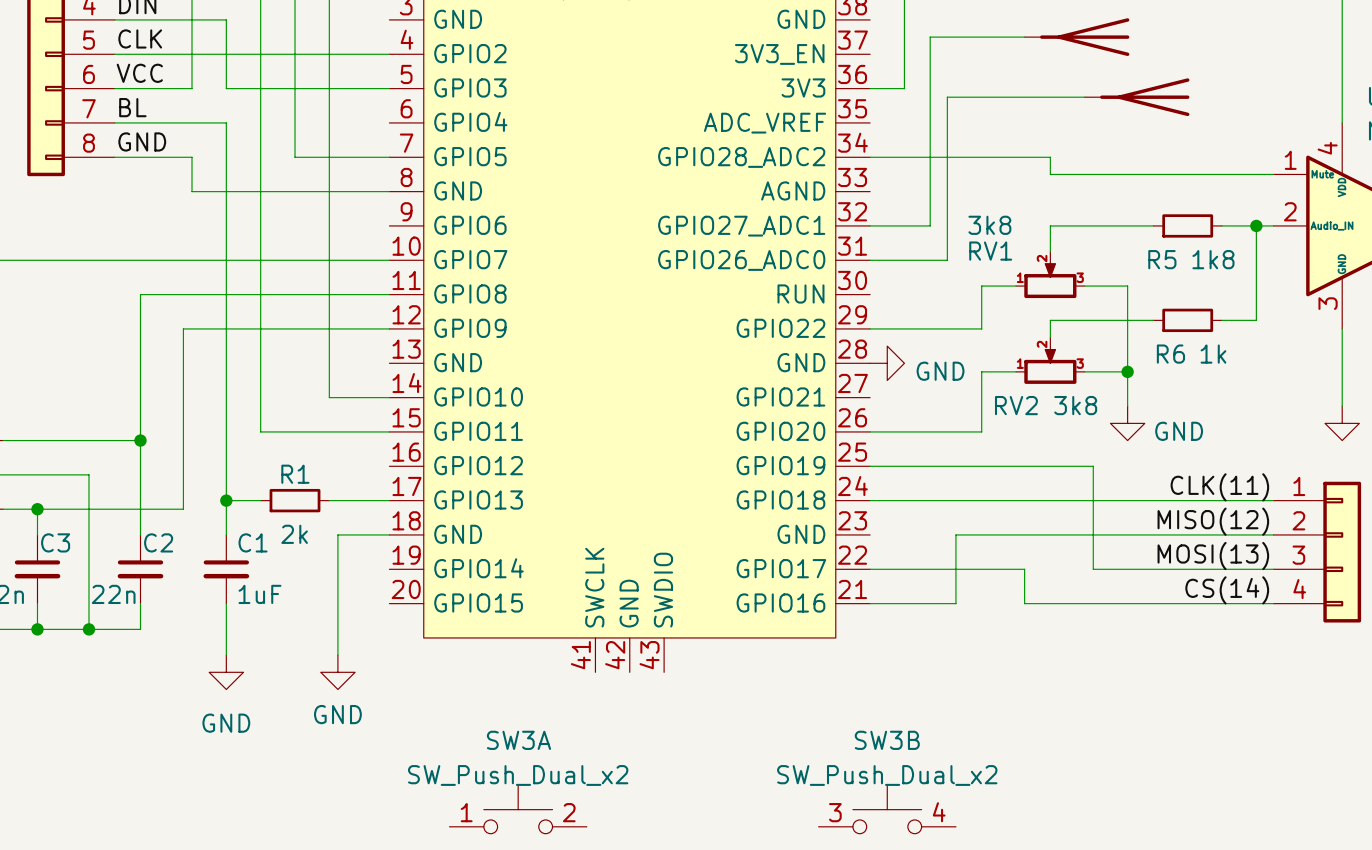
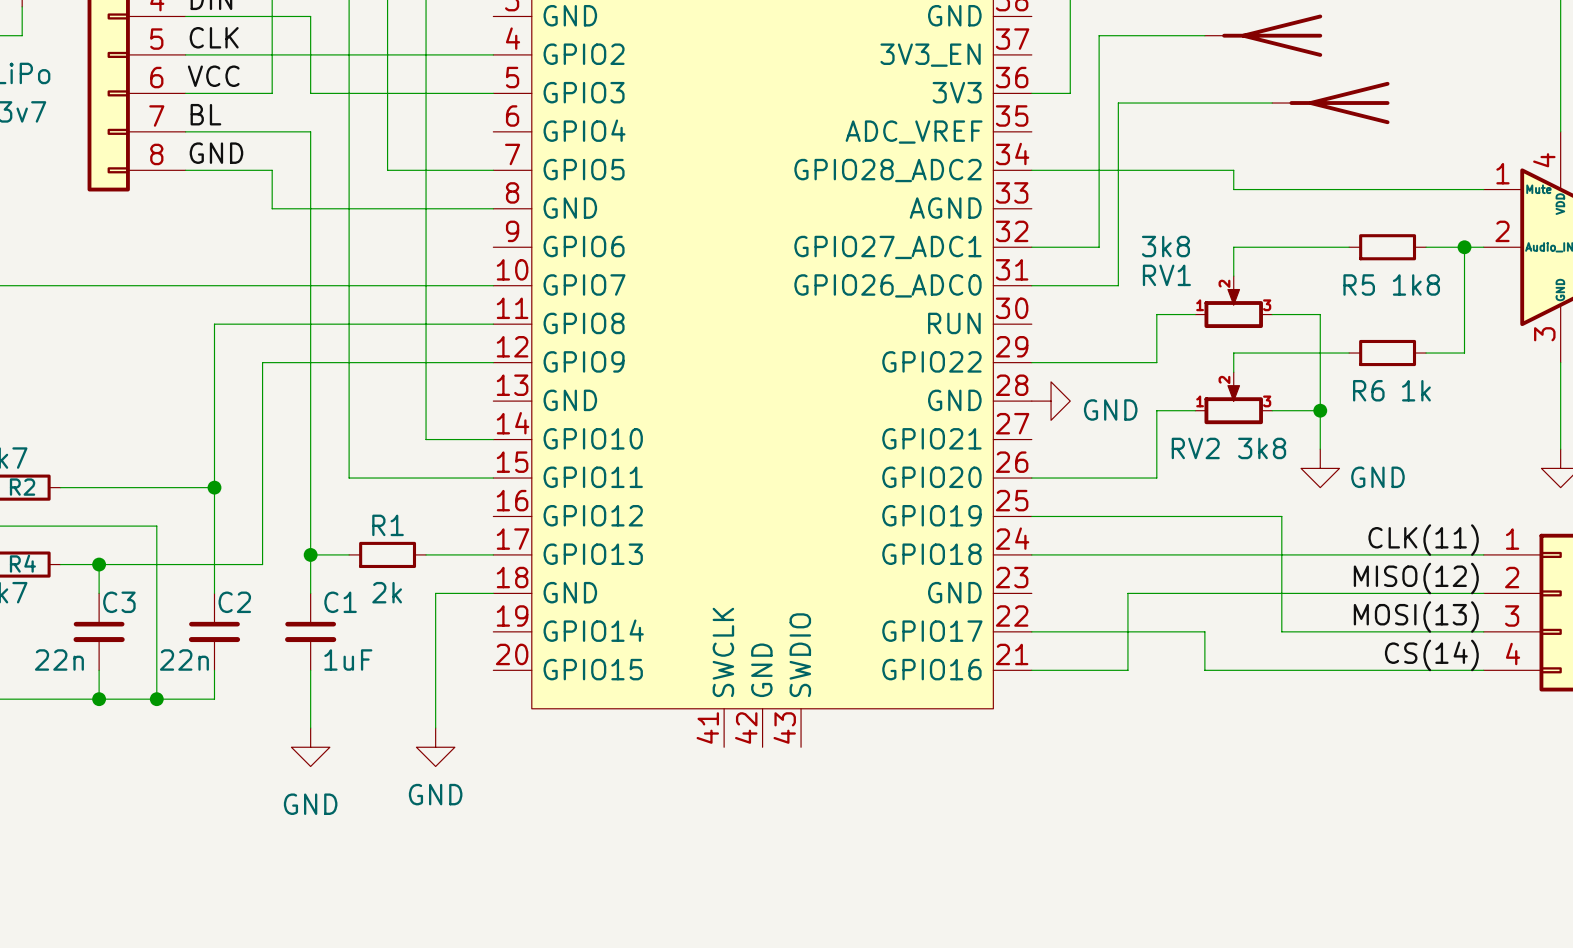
SW3A: SW_Push_Dual_x2 (518, 809) -> none
SW3B: SW_Push_Dual_x2 (887, 809) -> none

